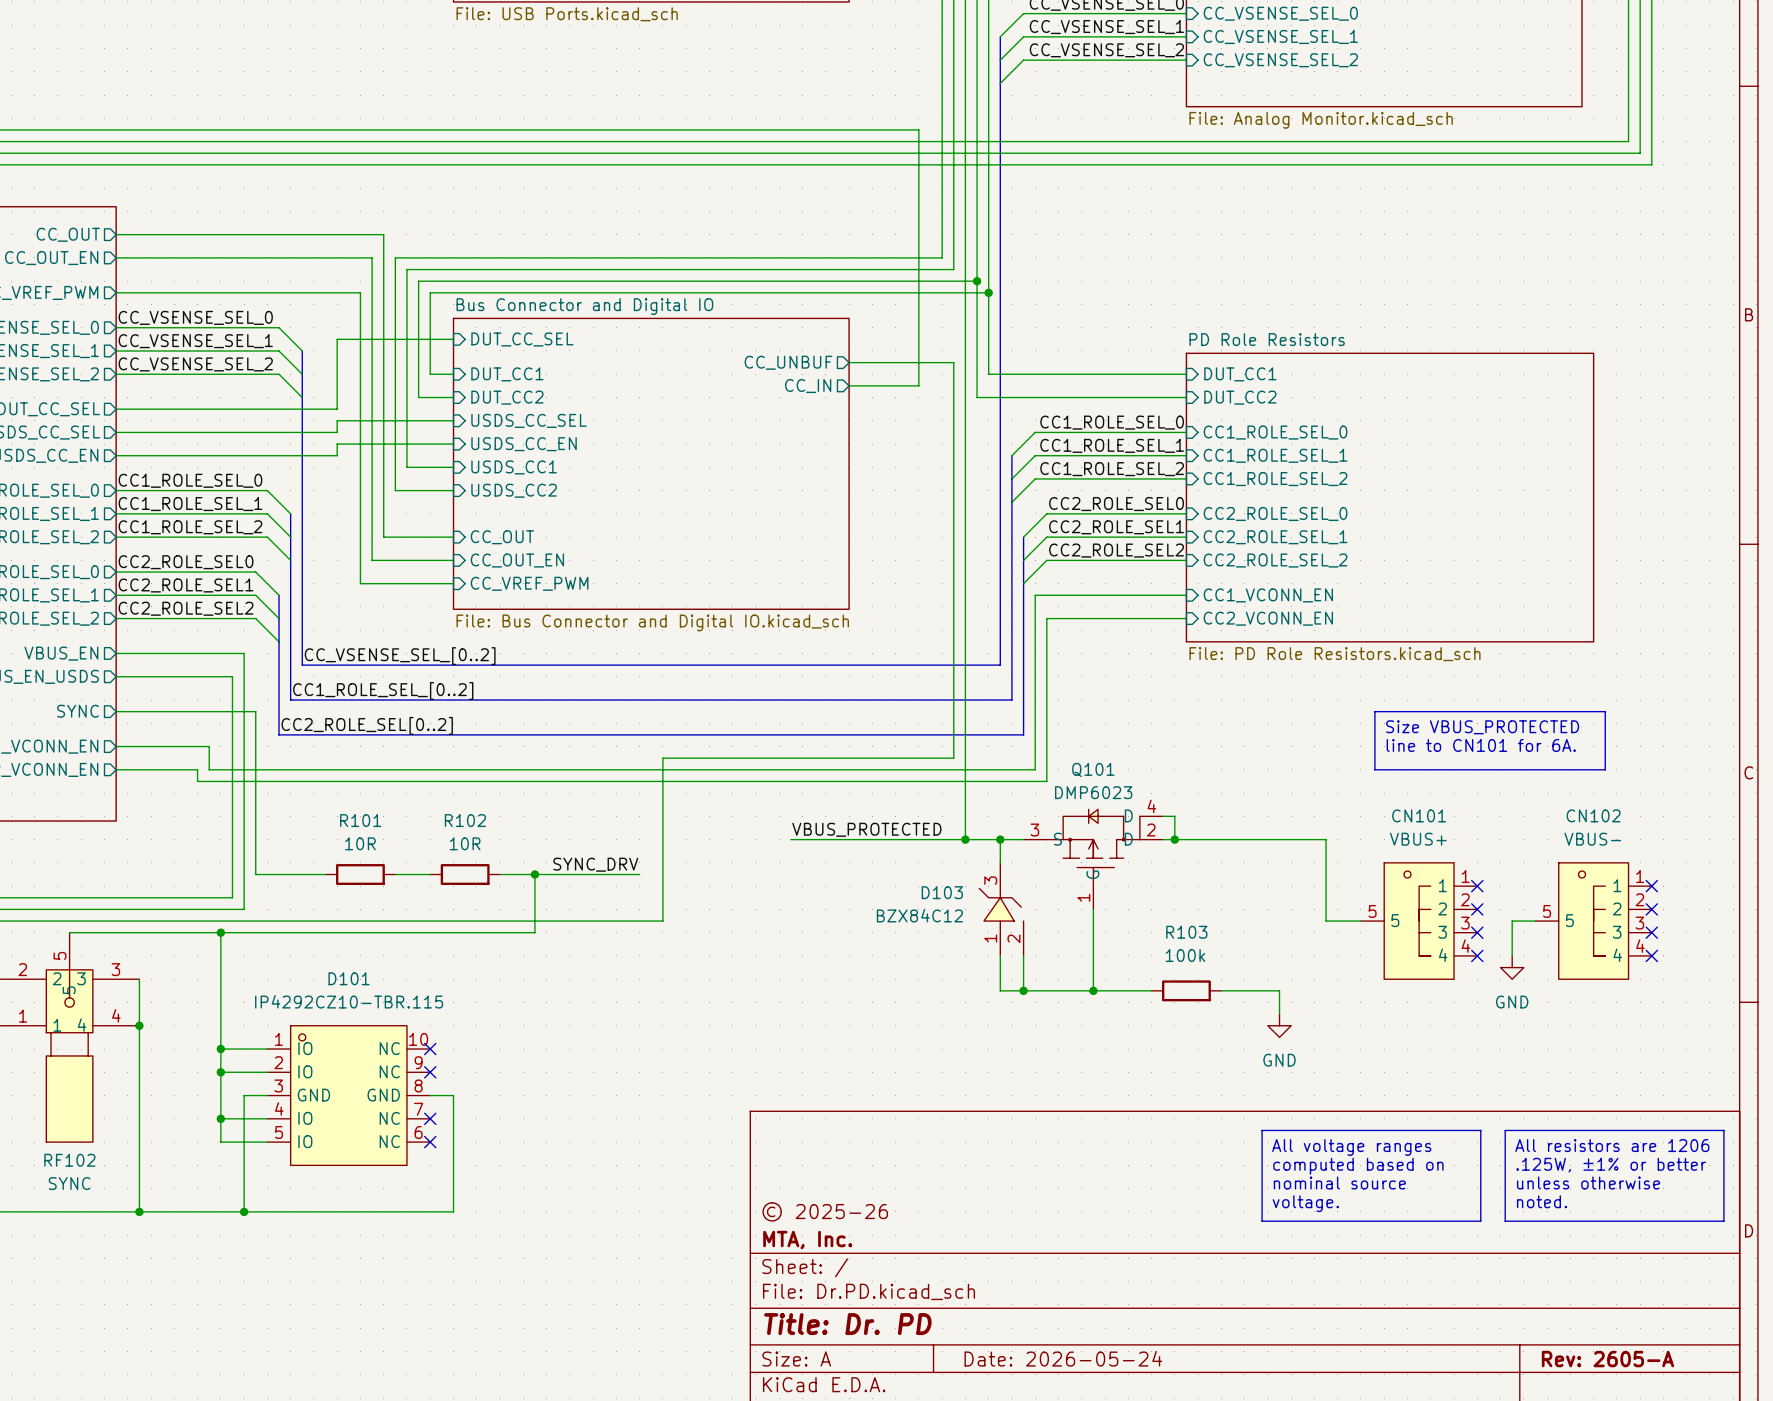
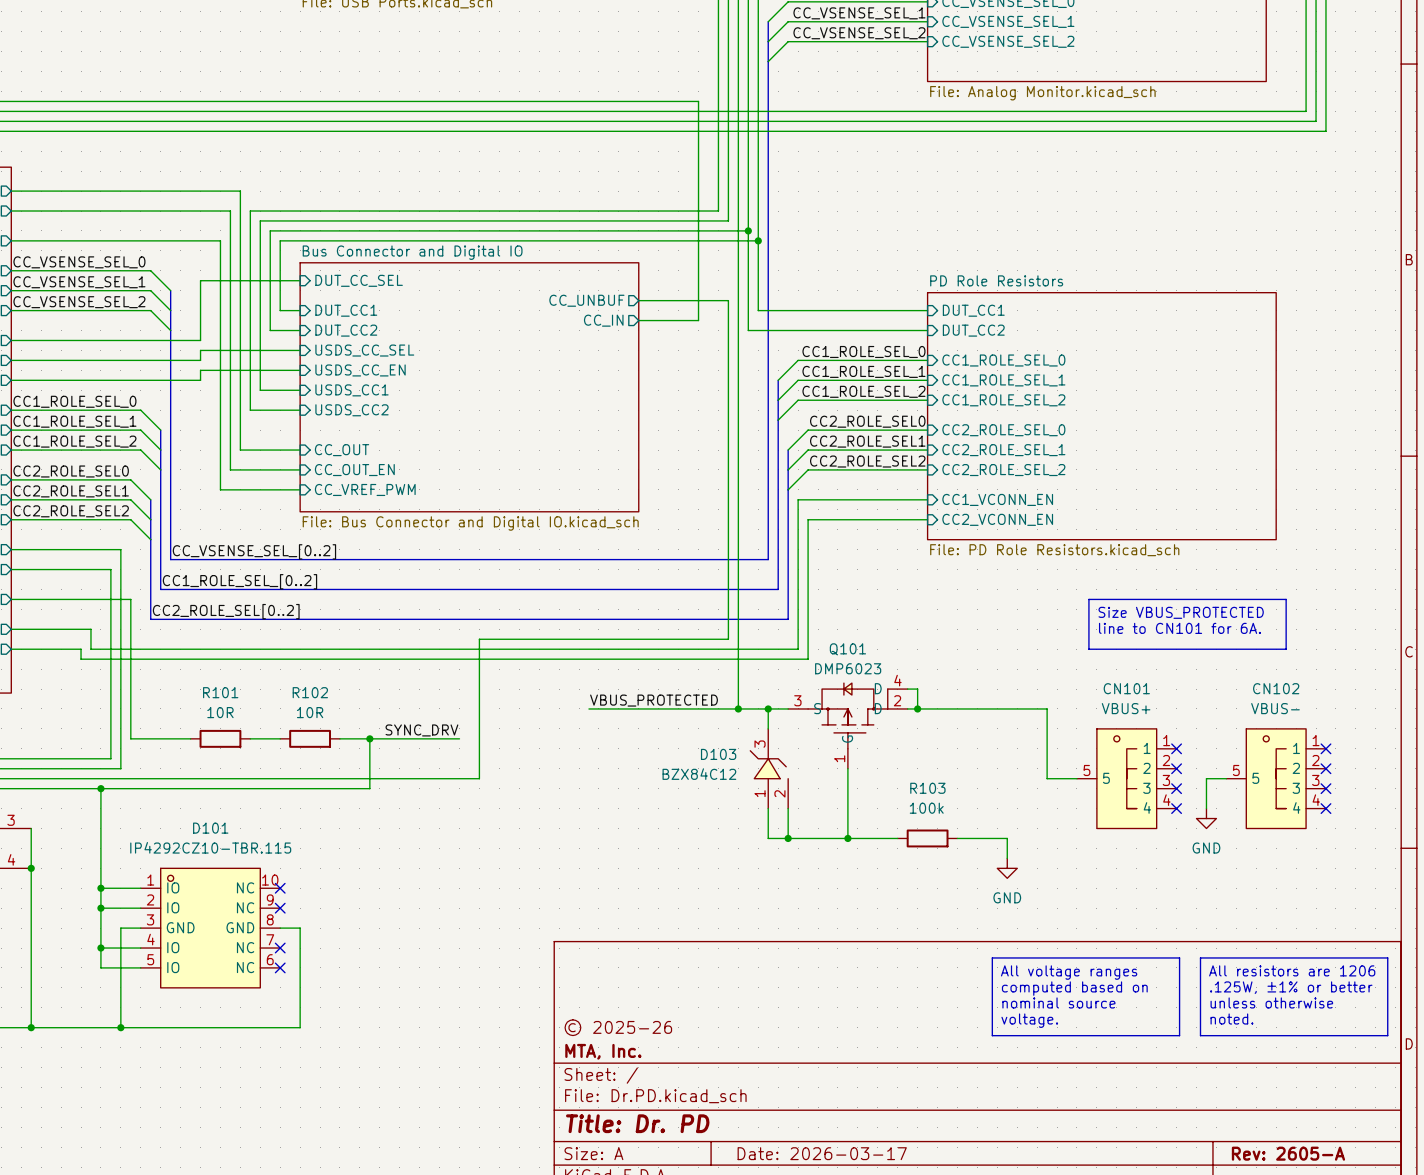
title block: Date: 2026-05-24 (1063, 1358) -> Date: 2026-03-17 (822, 1153)

